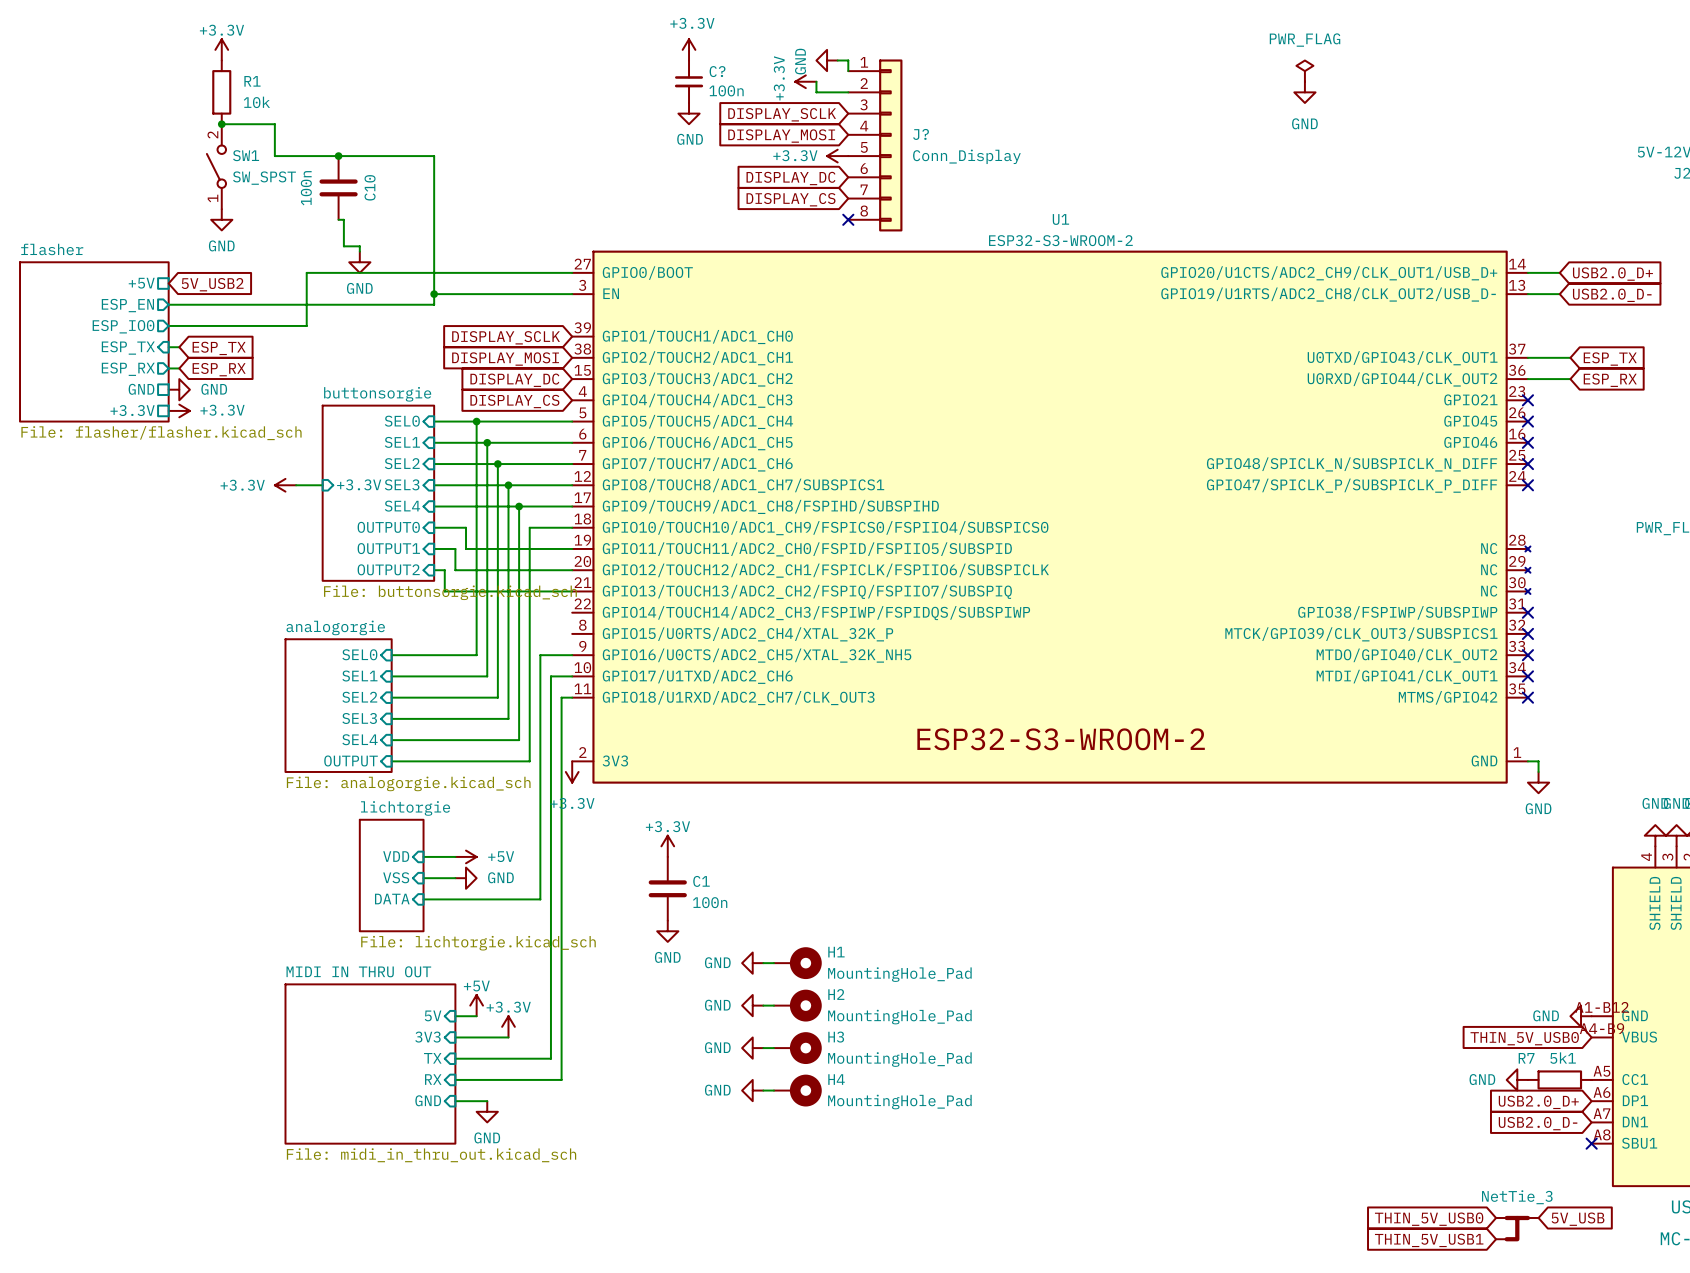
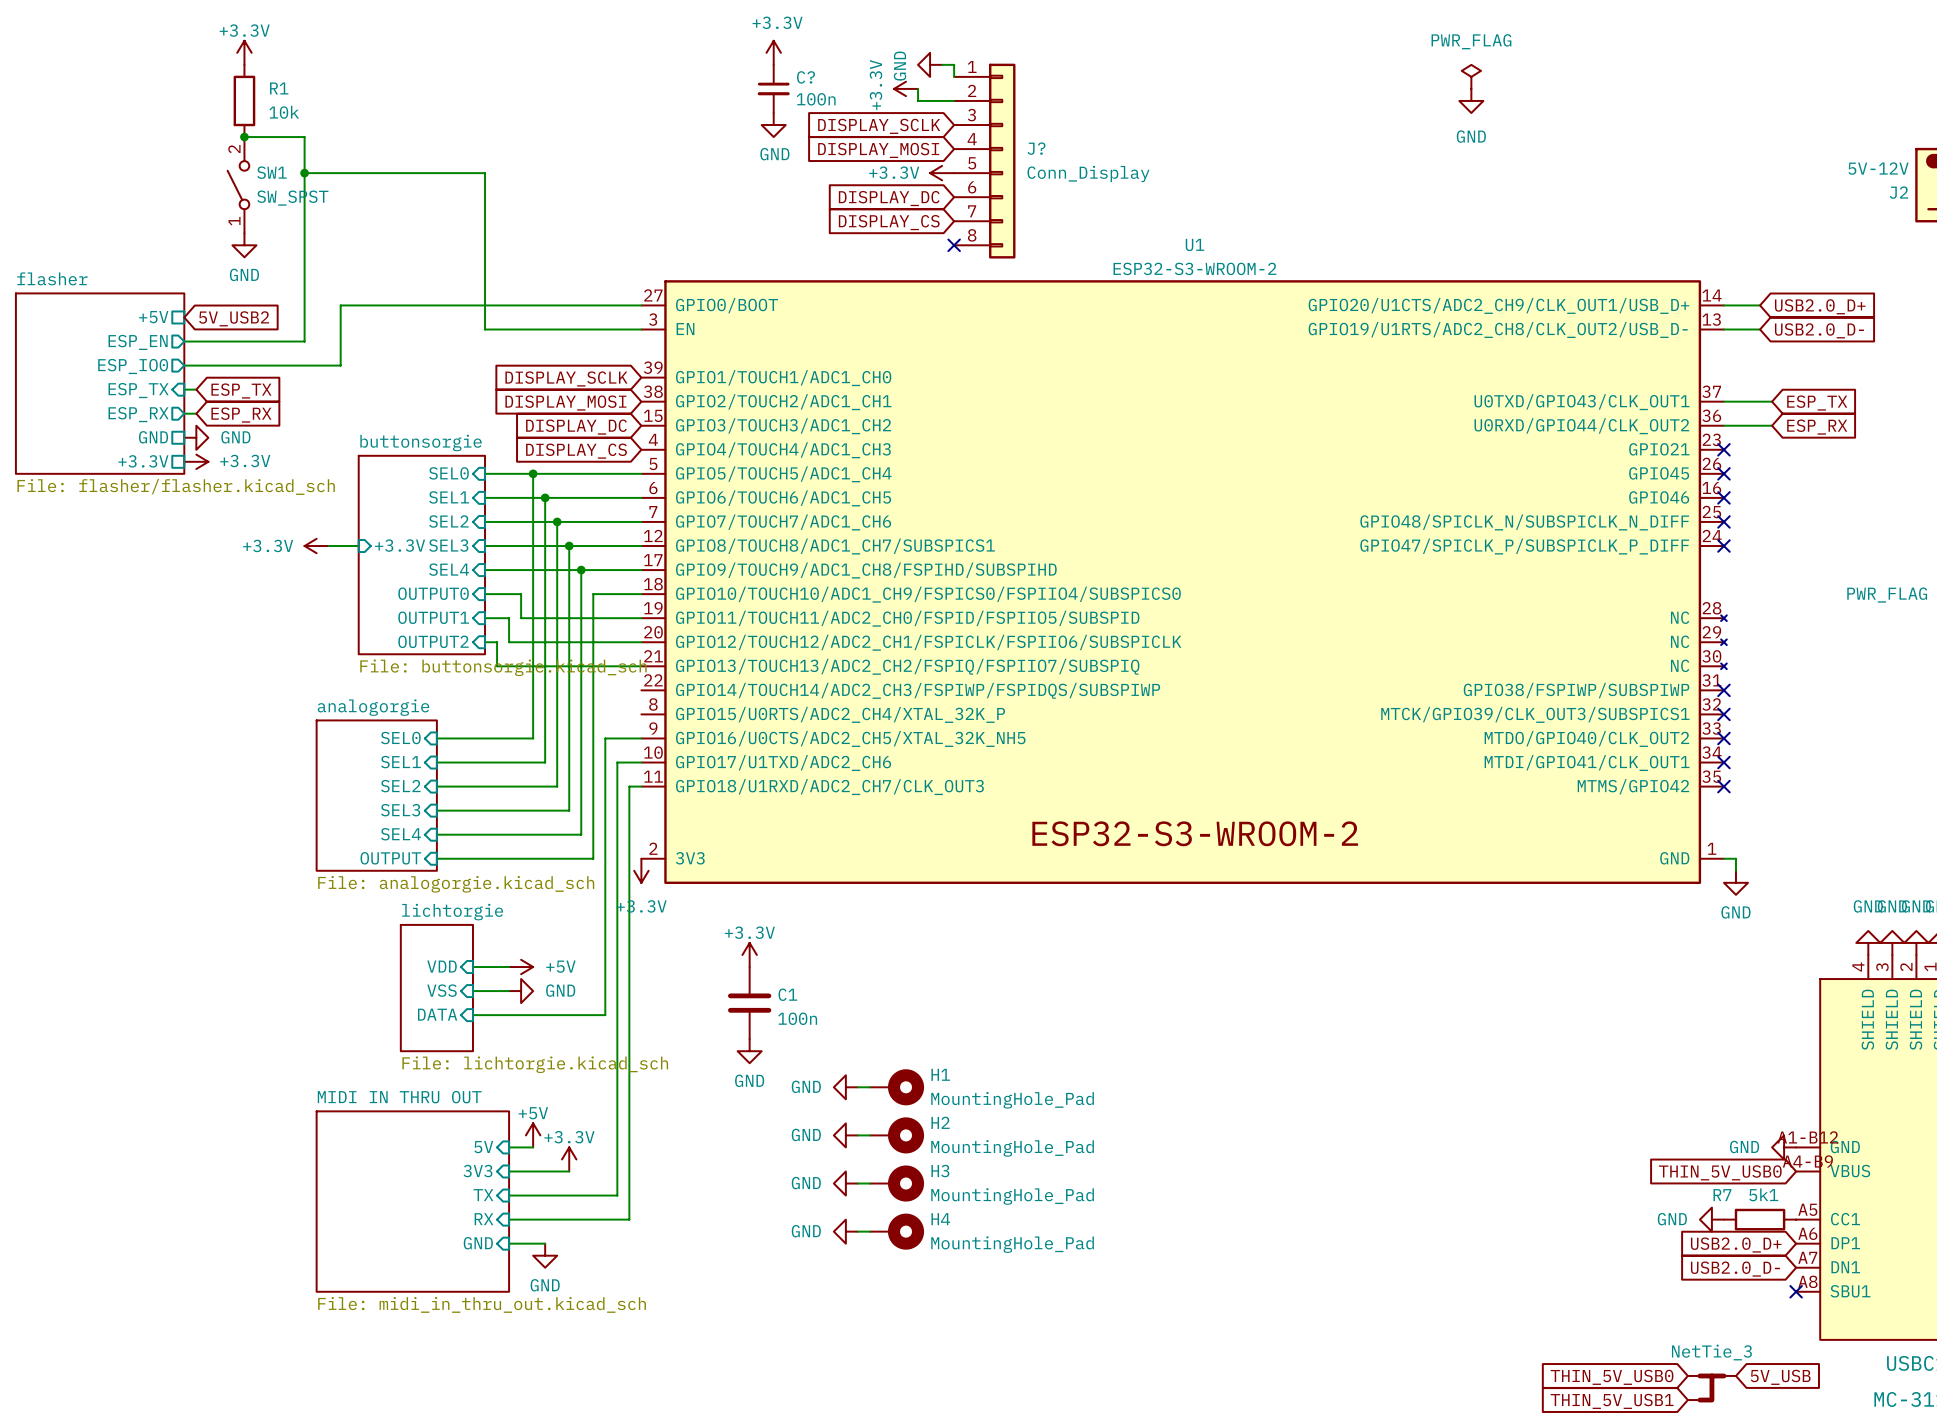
junction: none -> (304, 173)
junction: (338, 156) -> none
C10: 100n (338, 187) -> none
wire: (338, 219) (343, 219) (343, 246) (359, 246) (359, 251) -> none
power symbol: GND (359, 262) -> none
wire: (434, 294) (434, 304) (274, 304) -> (304, 173) (304, 341)
junction: (434, 294) -> none

